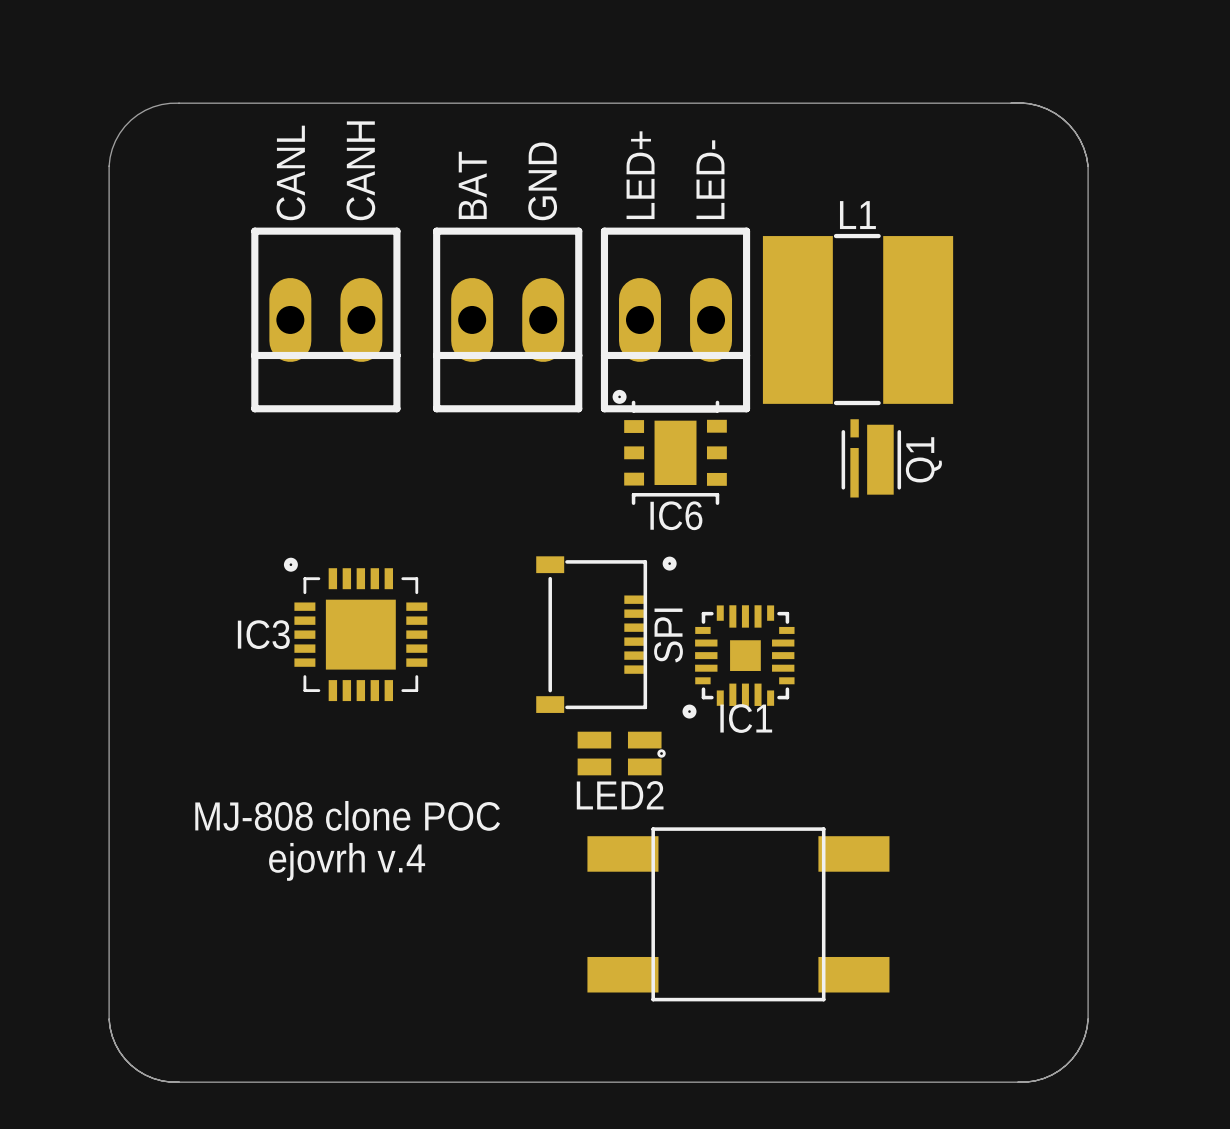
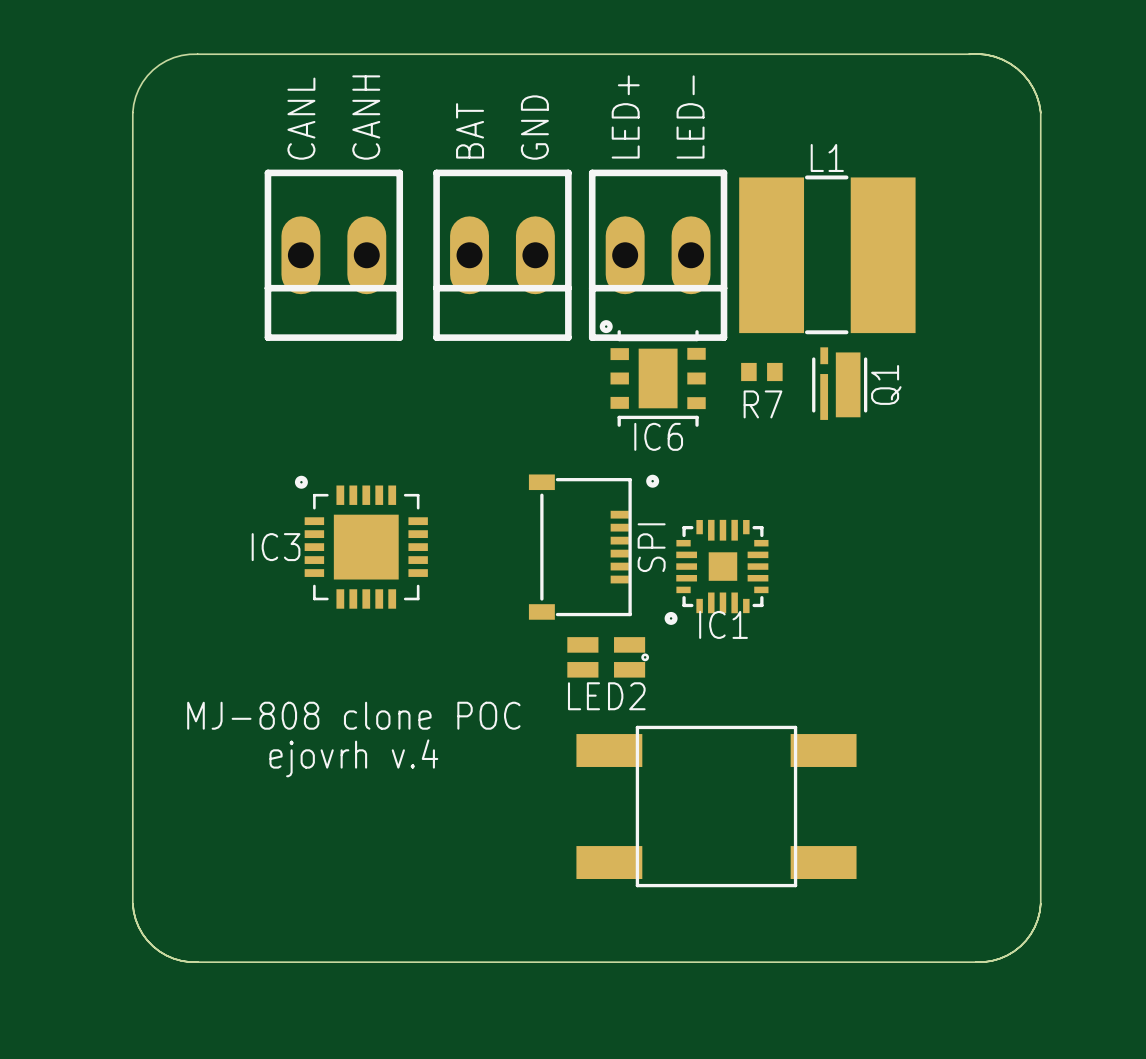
R7: none -> (761, 372)

